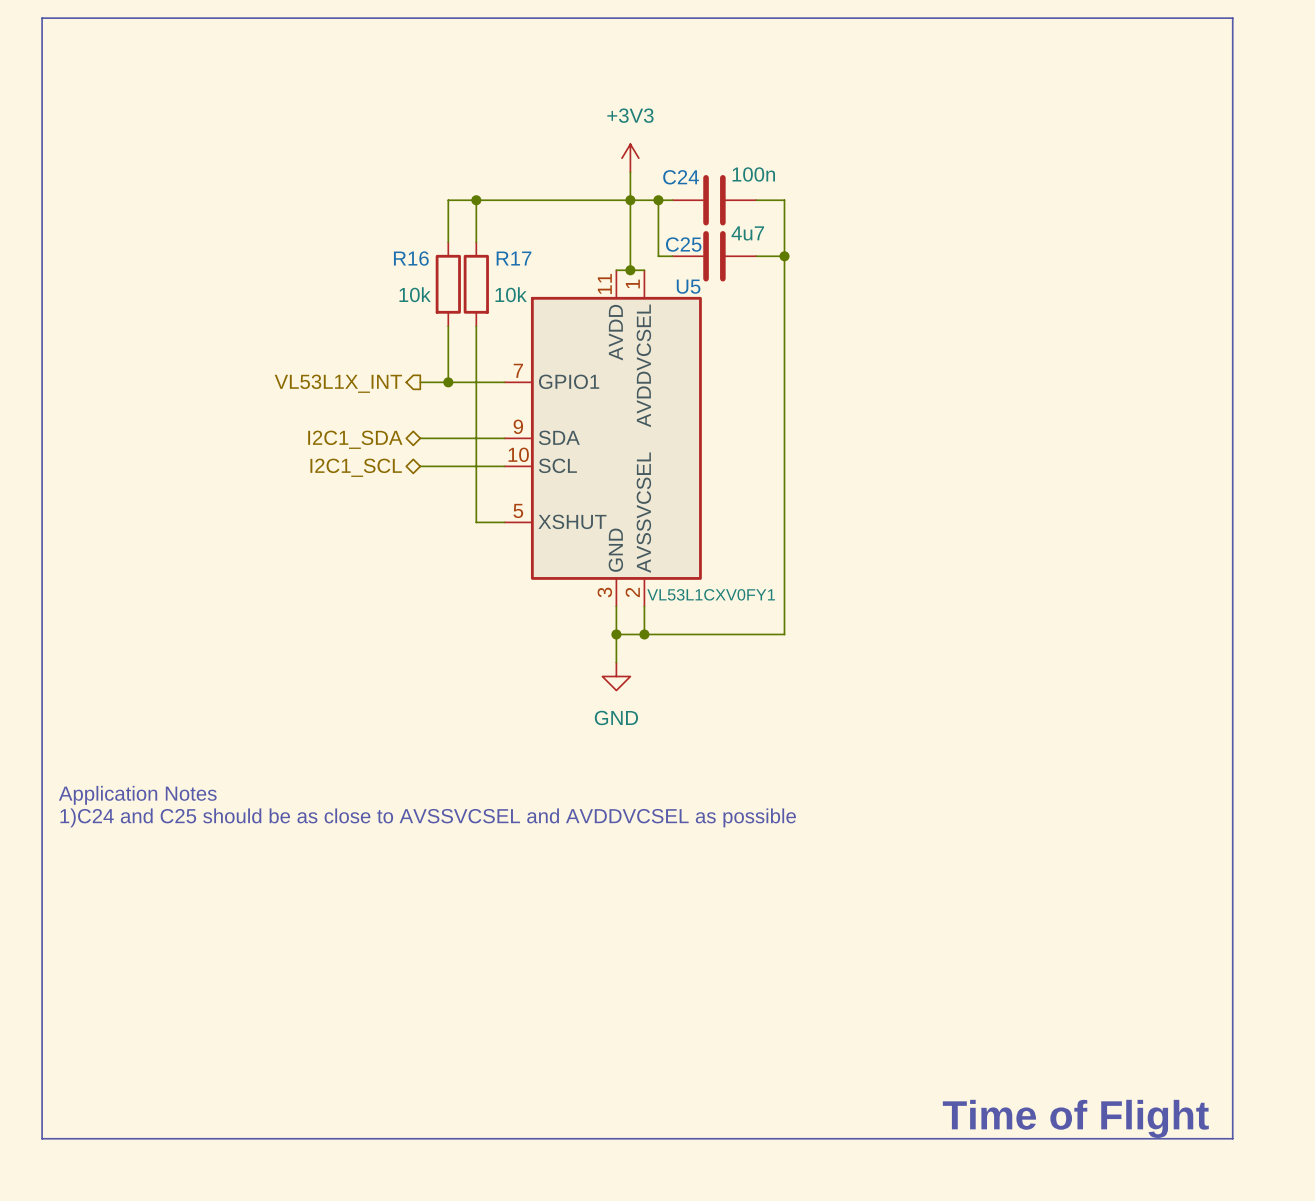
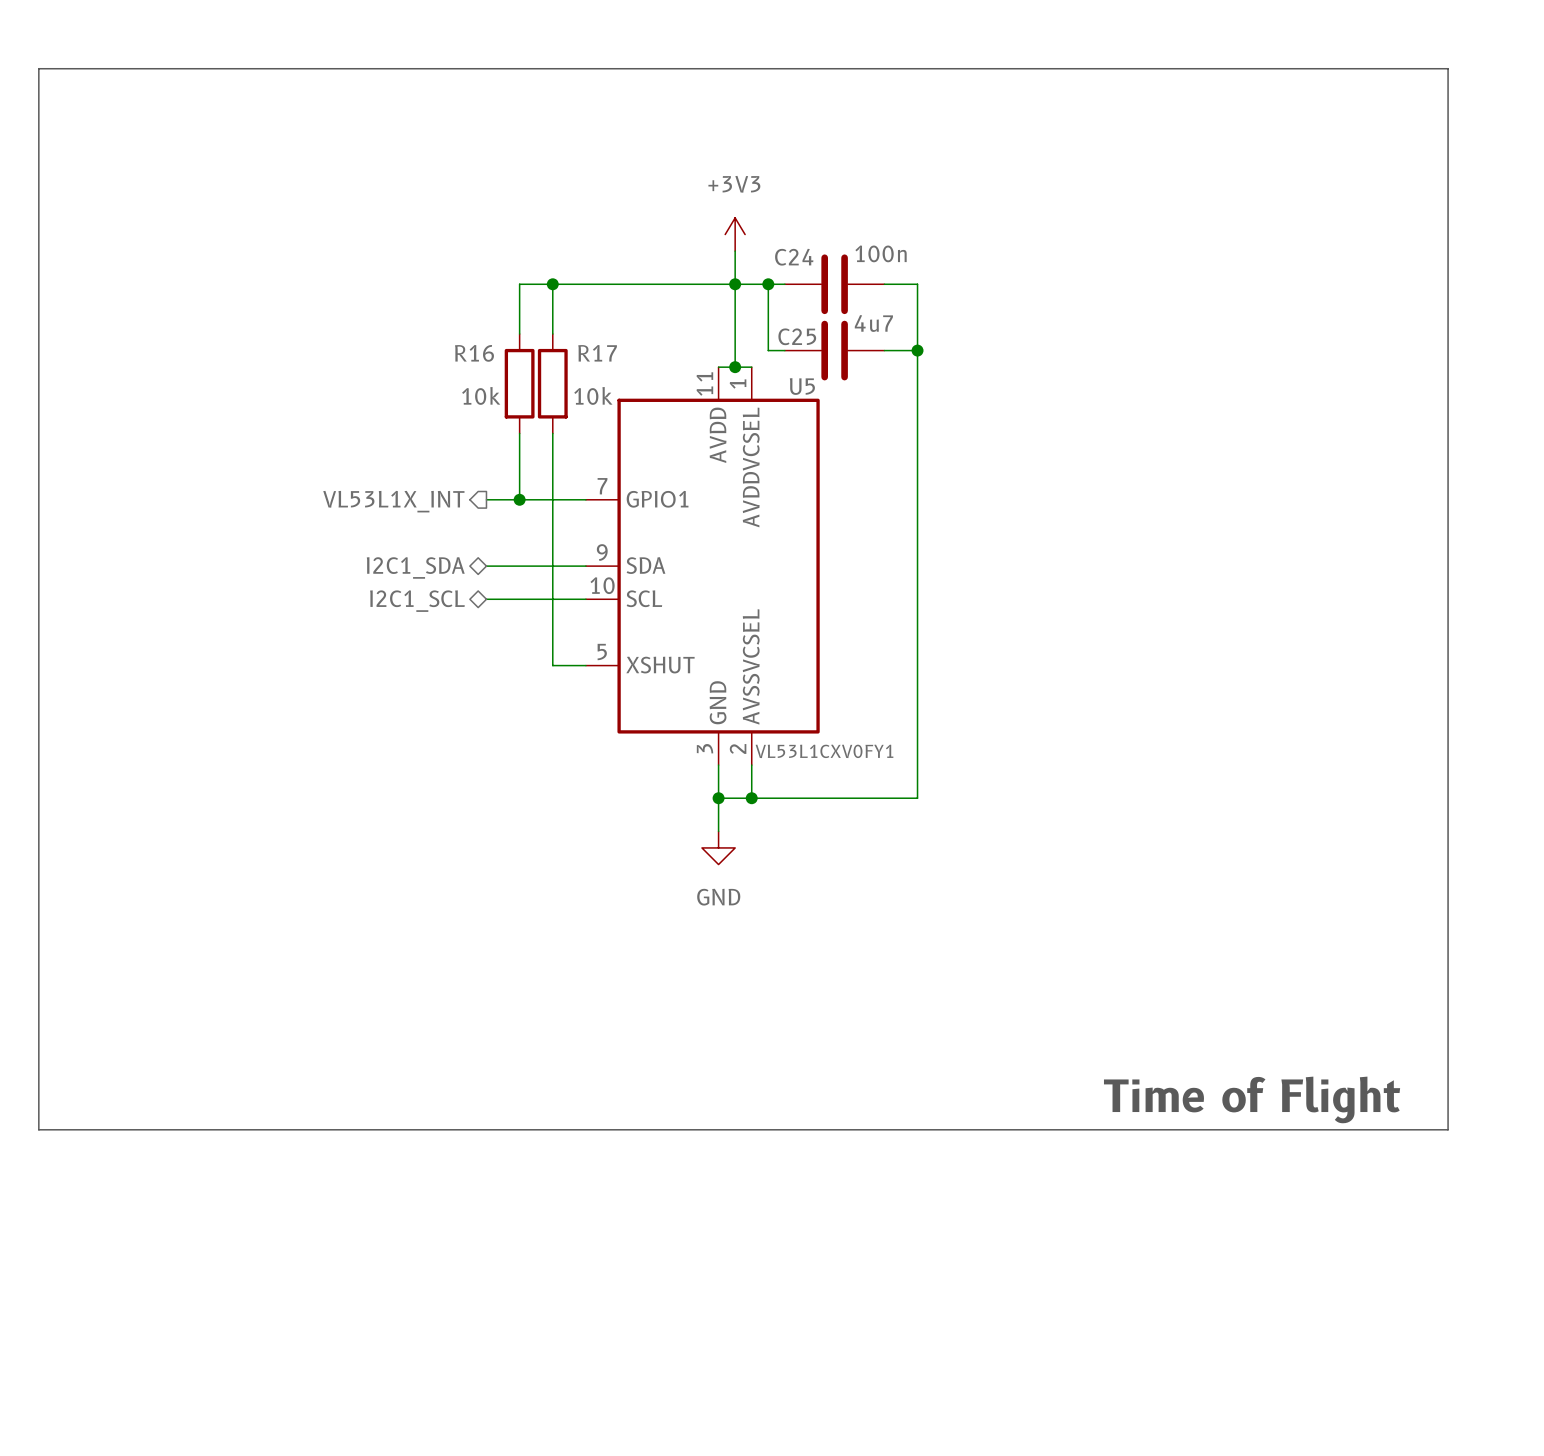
text: Application Notes (137, 795) -> none
text: 1)C24 and C25 should be as close to AVSSVCSEL and AVDDVCSEL as possible (428, 817) -> none
line: (42, 914) (42, 1138) (1232, 1138) (1232, 914) -> (38, 1129) (1448, 1129)
text position: Time of Flight (1075, 1118) -> Time of Flight (1252, 1099)

